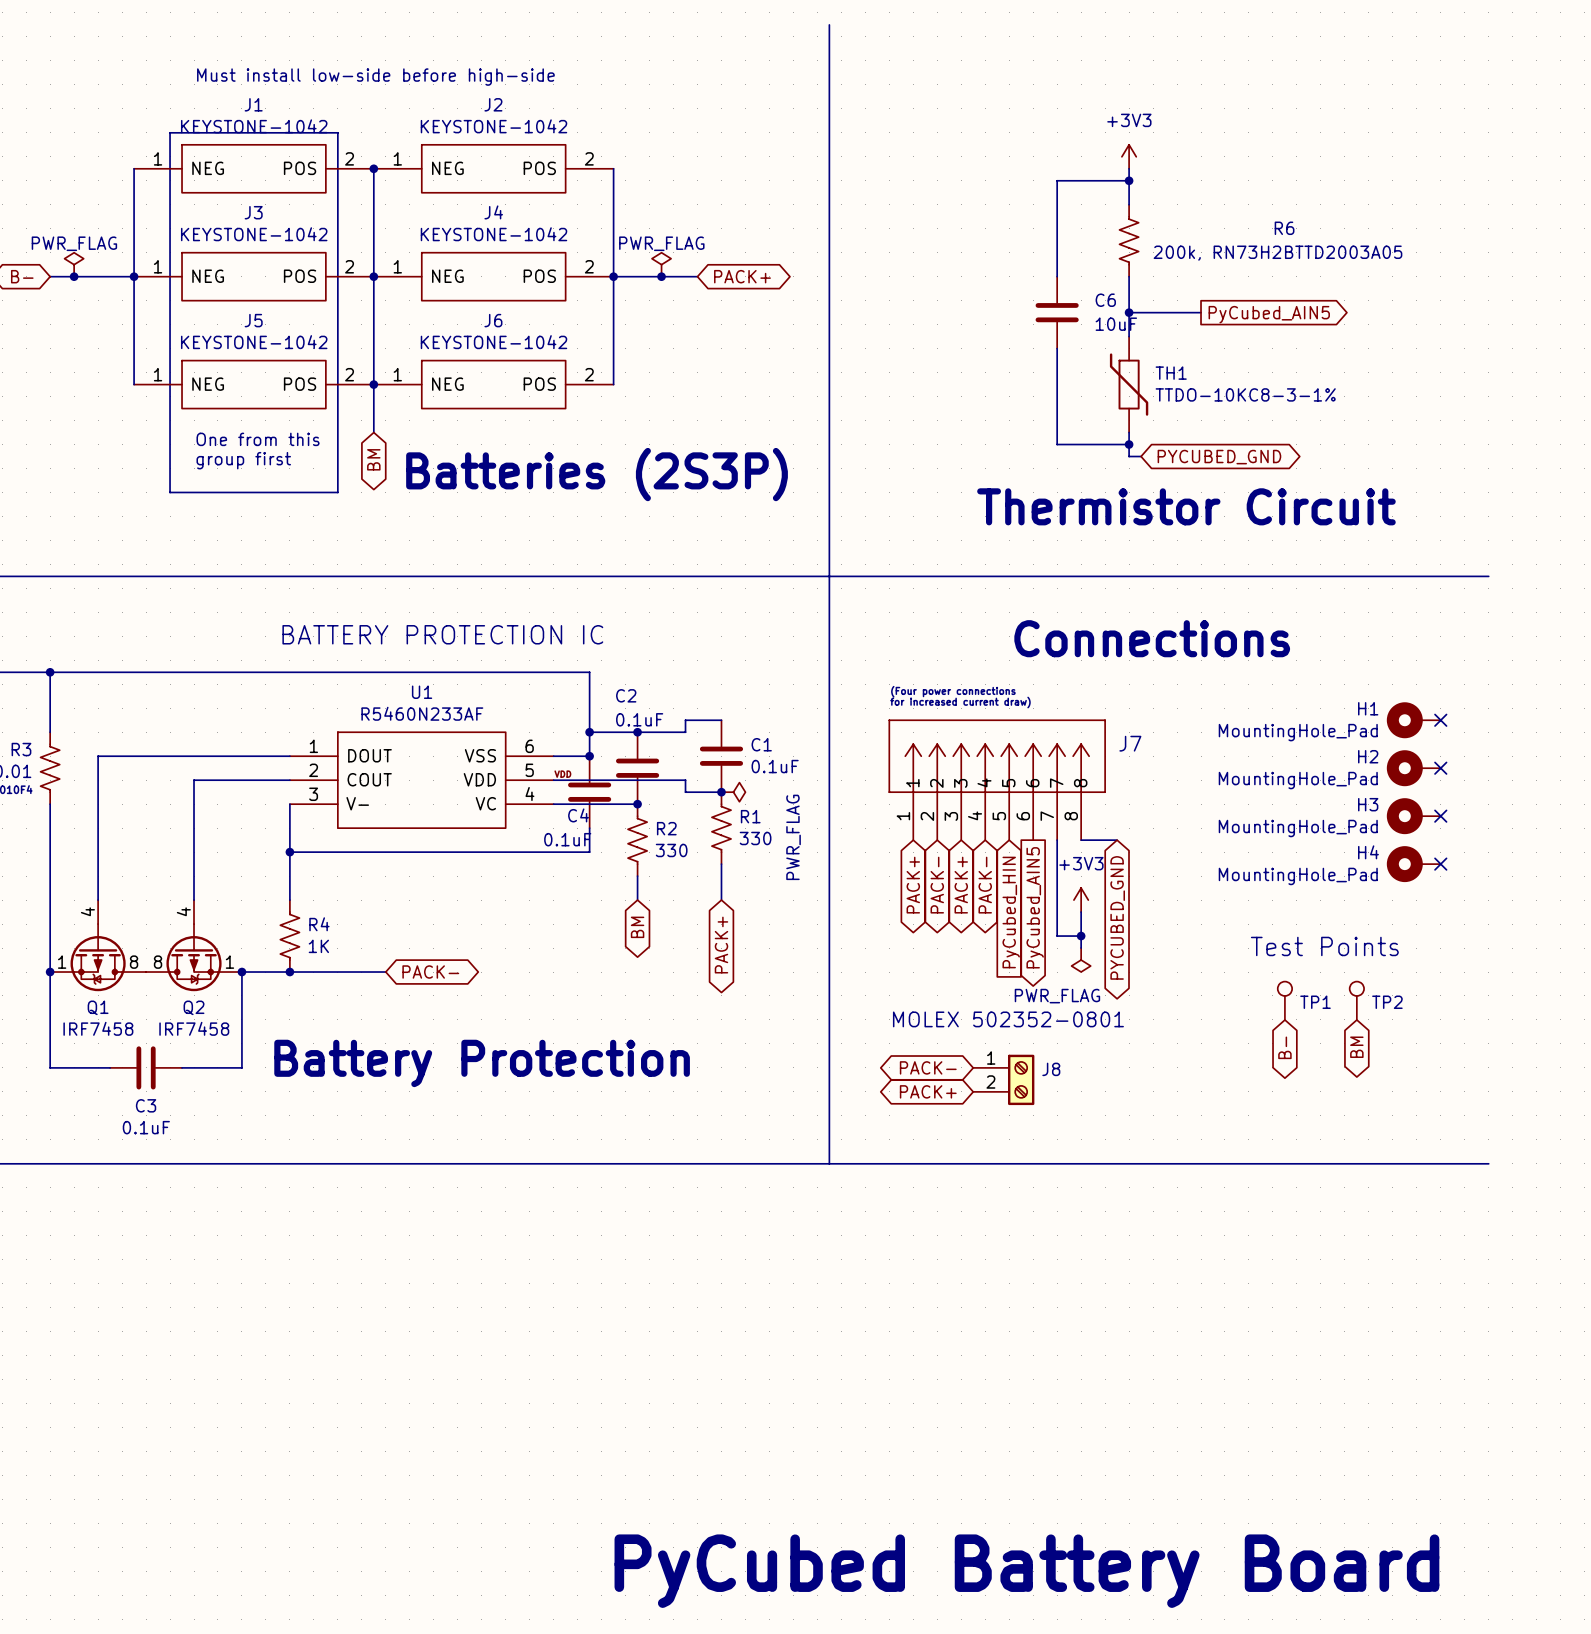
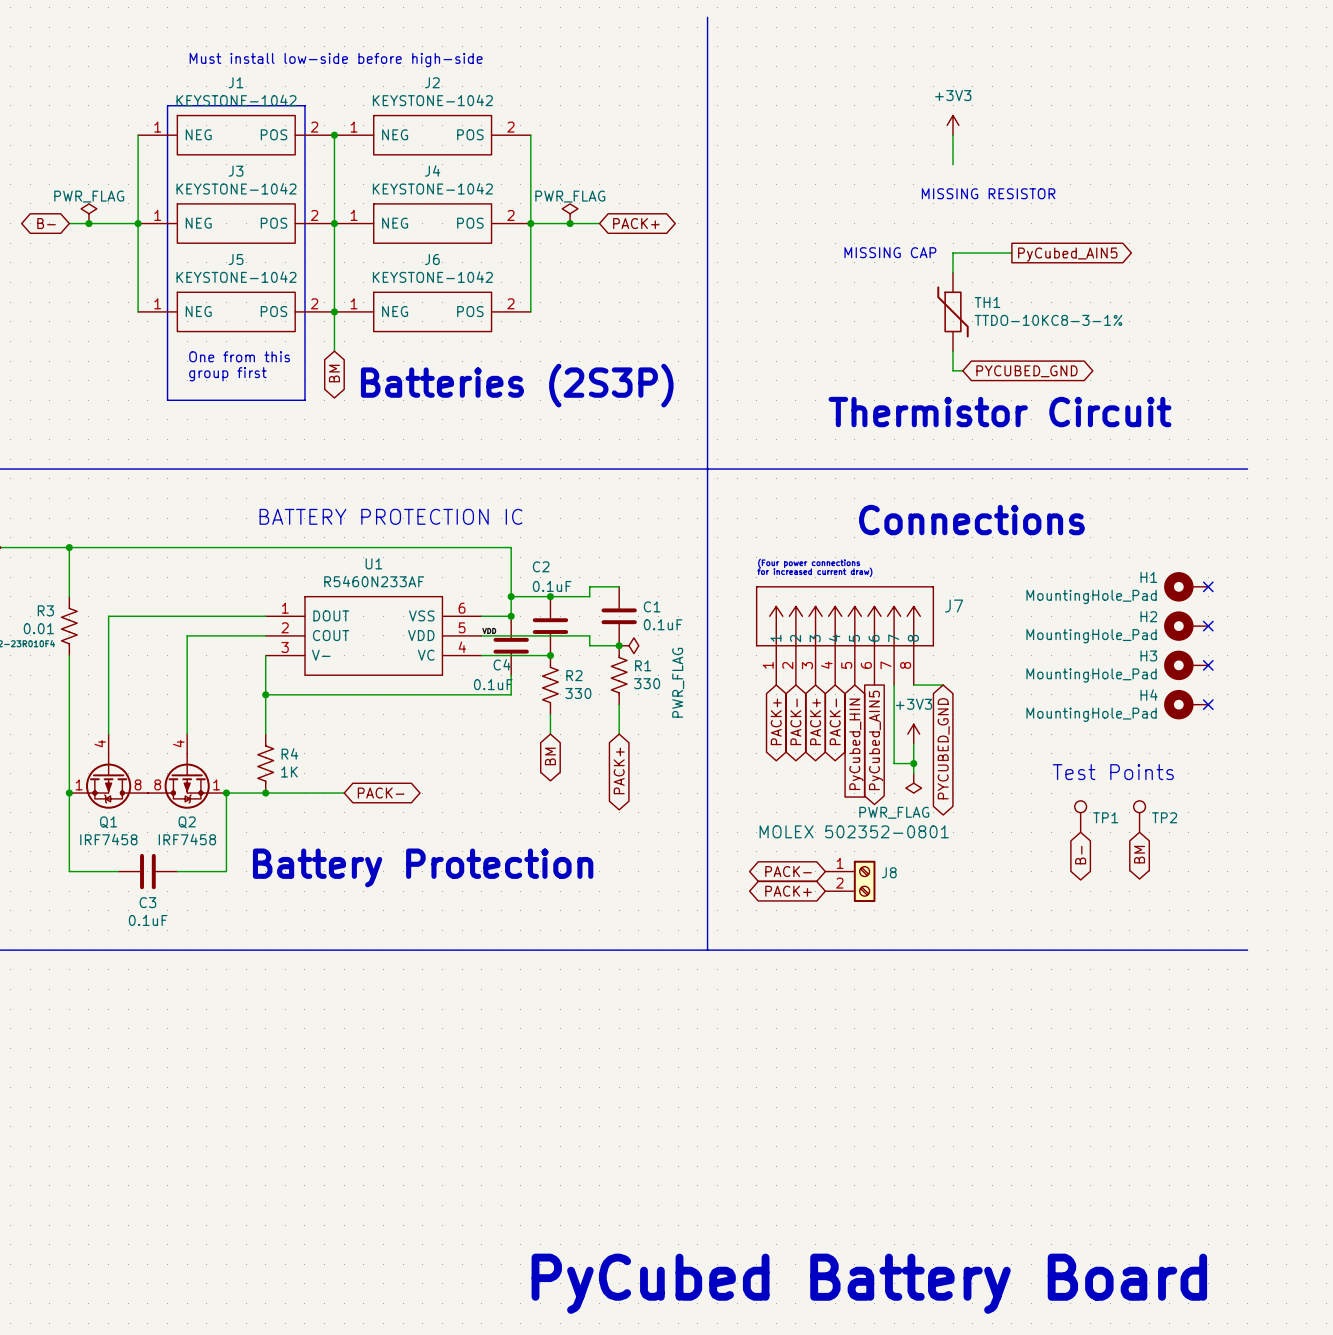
wire: (1129, 180) (1057, 180) (1057, 276) -> none
junction: (1129, 180) -> none
R6: 200k, RN73H2BTTD2003A05 (1129, 240) -> none
text: none -> MISSING RESISTOR (988, 193)
wire: (1129, 276) (1129, 312) -> none
text: none -> MISSING CAP (890, 252)
C6: 10uF (1057, 312) -> none
junction: (1129, 312) -> none
wire: (1057, 348) (1057, 444) (1129, 444) -> none
junction: (1129, 444) -> none

